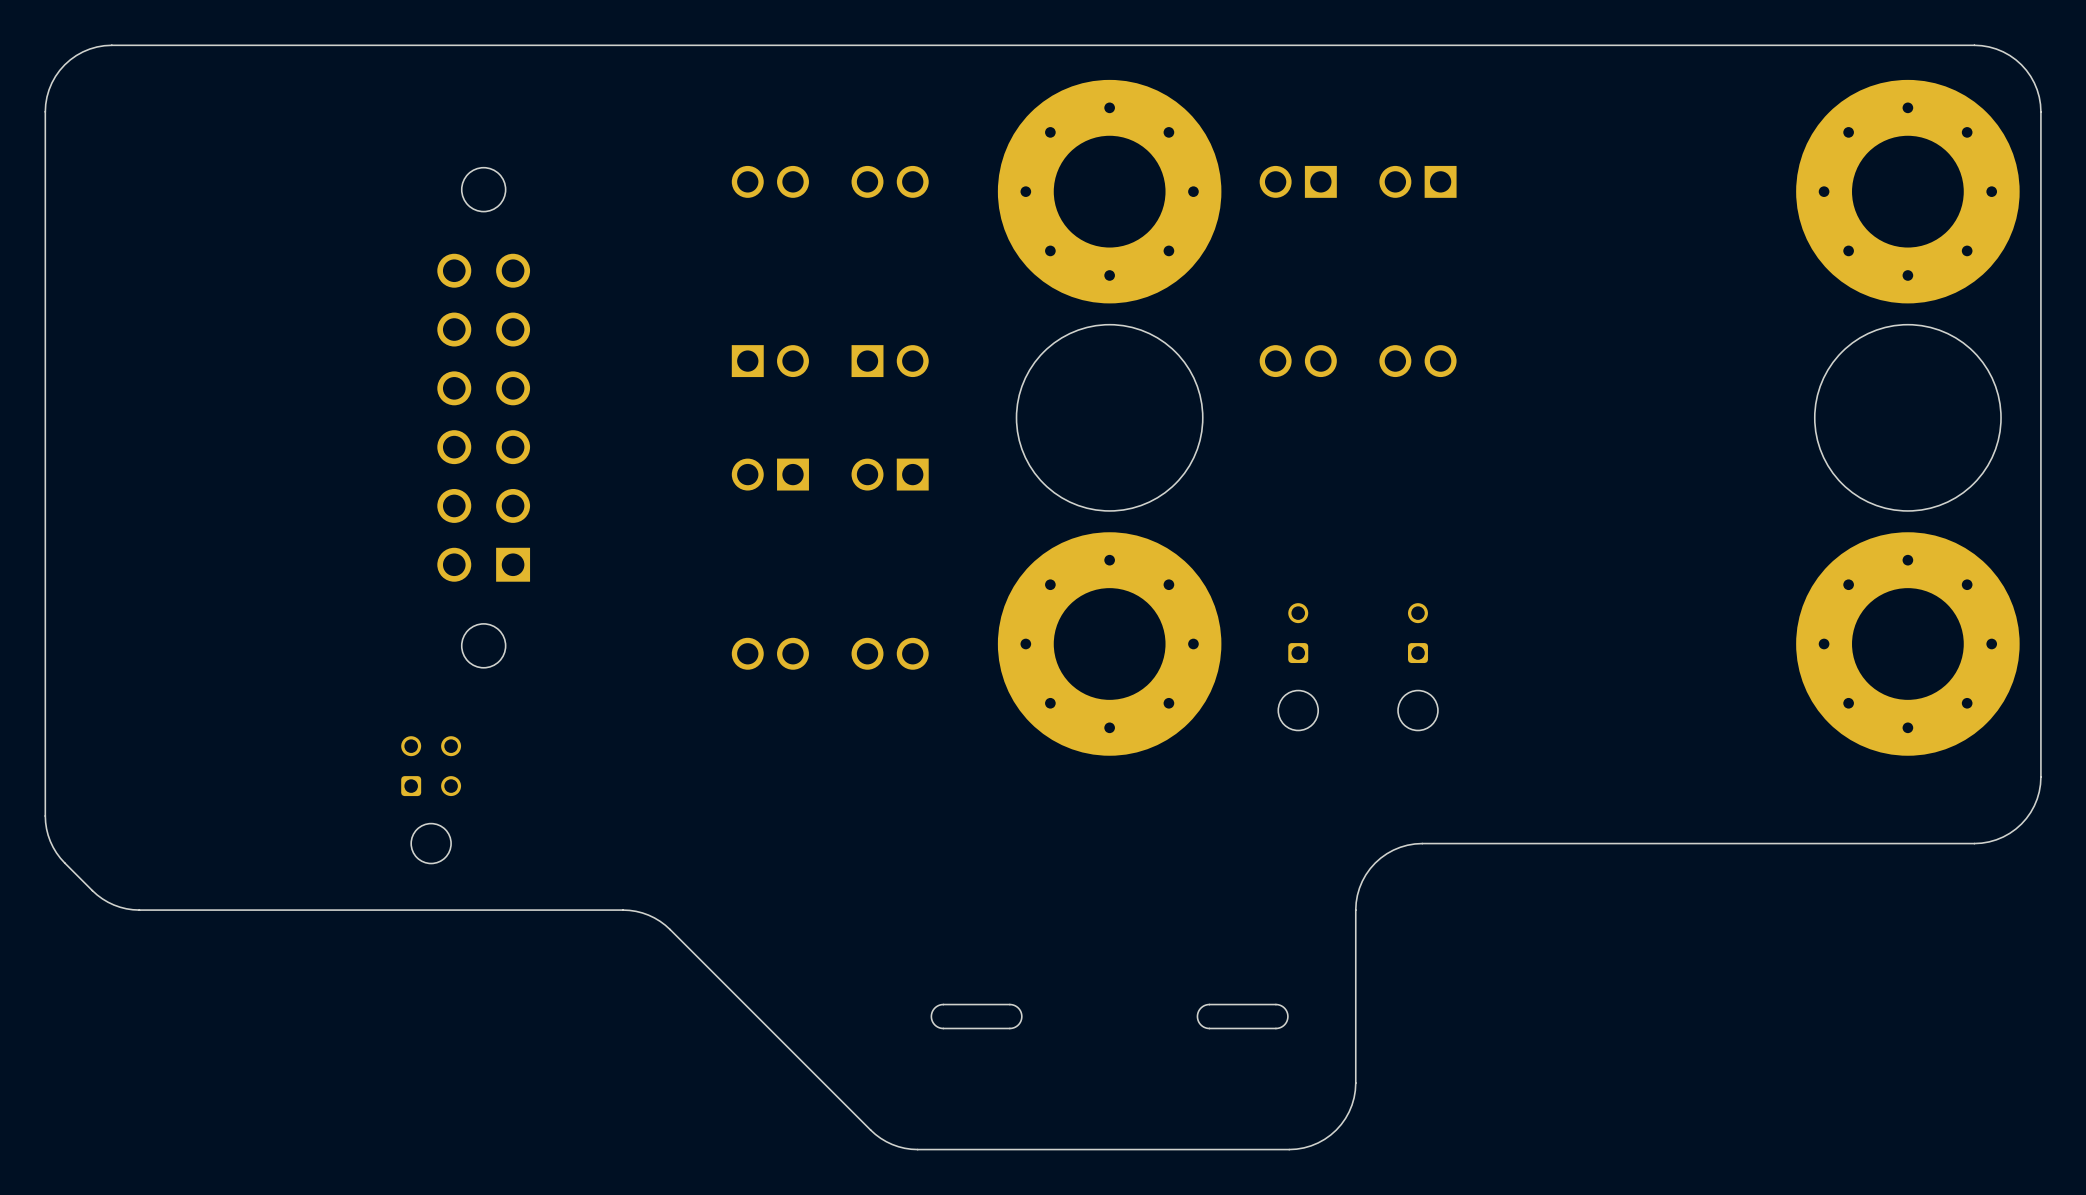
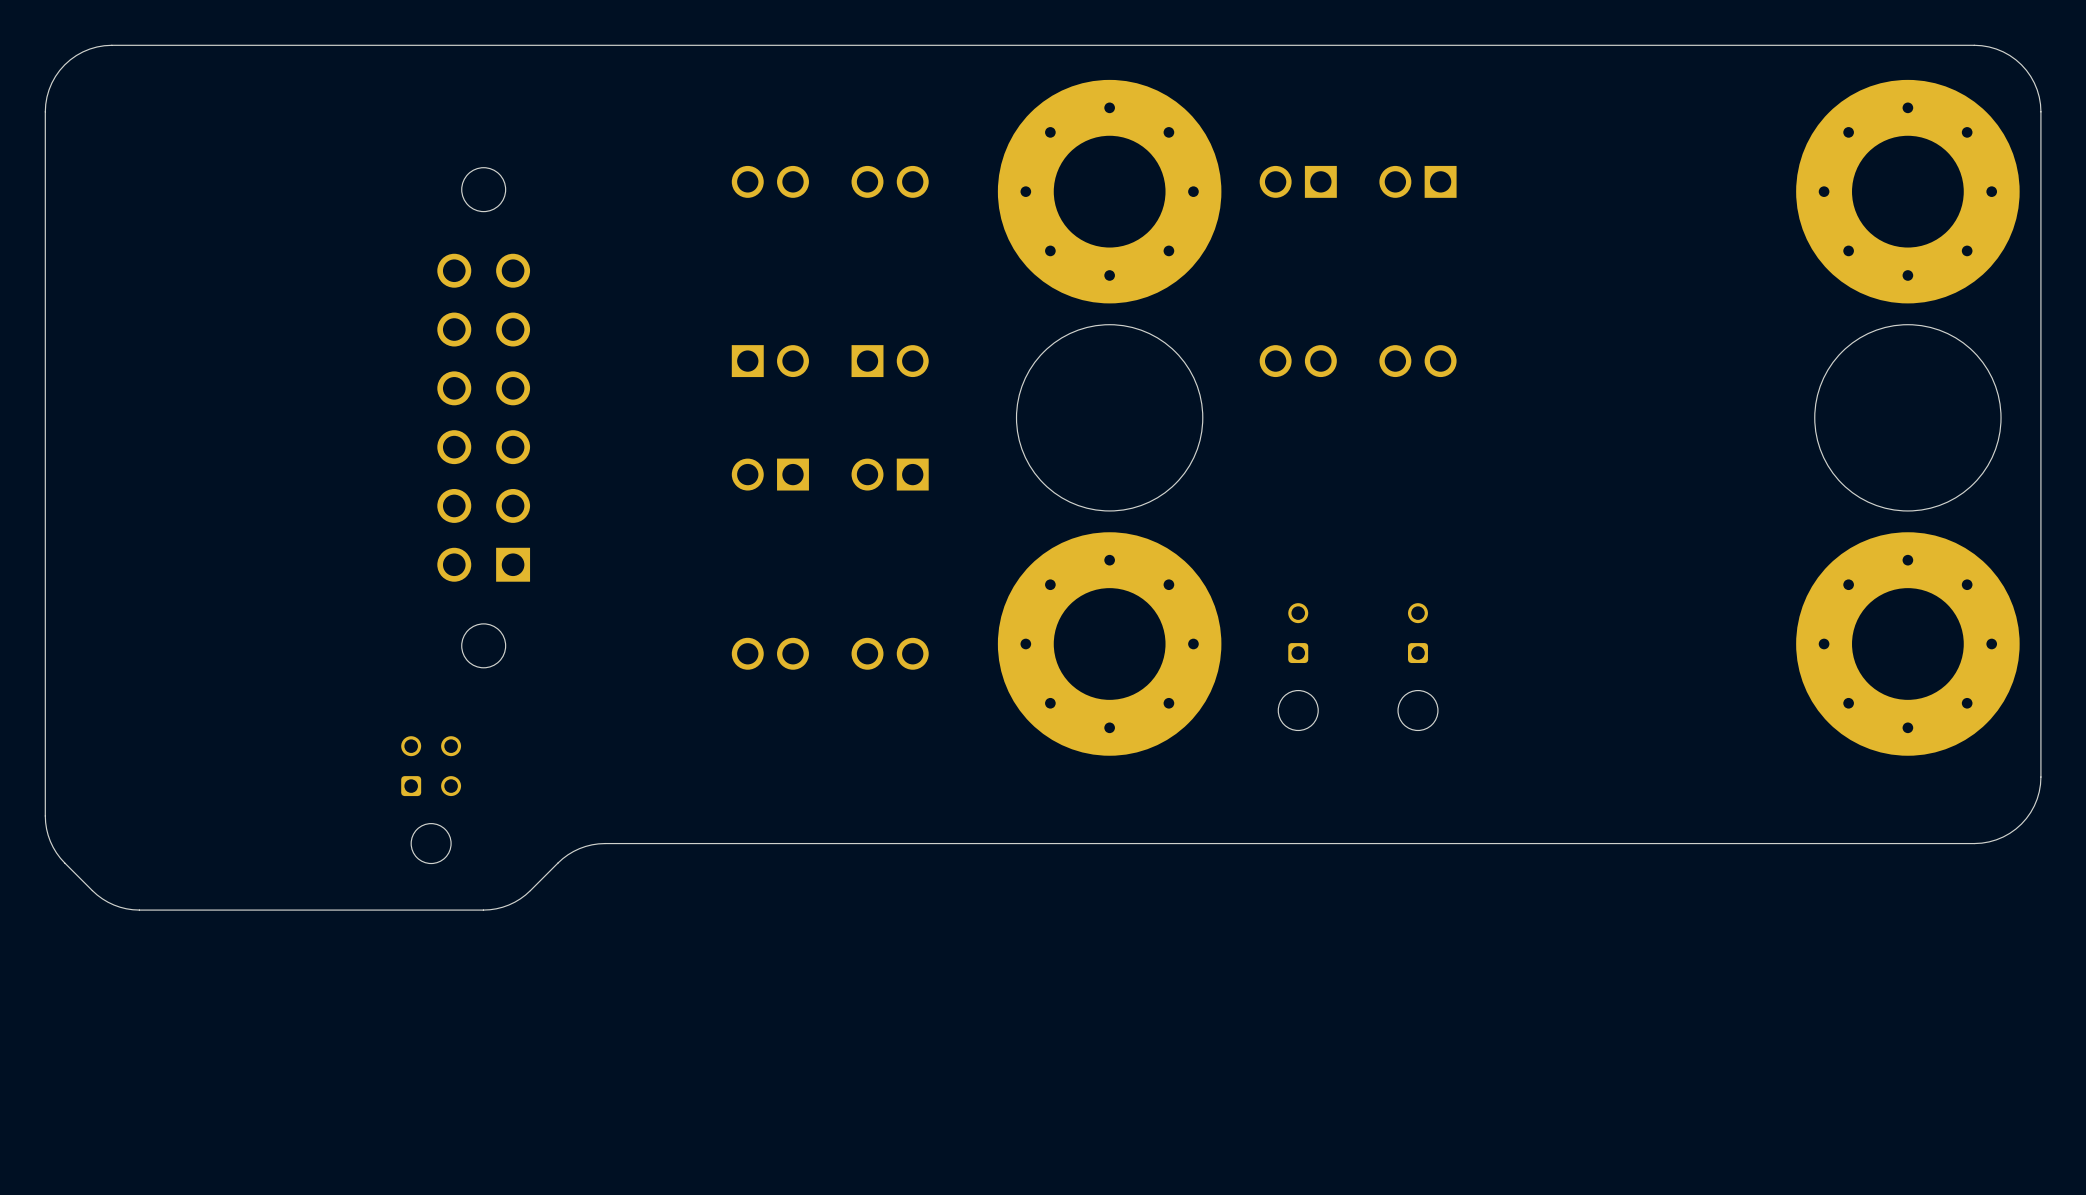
board edge: (1422, 843) (1407, 845) (1386, 853) (1370, 868) (1359, 888) (1355, 910) (1355, 1083) (1354, 1097) (1345, 1118) (1330, 1135) (1318, 1142) (1296, 1149) (917, 1149) (898, 1146) (886, 1141) (870, 1130) (670, 929) (654, 917) (636, 911) (623, 910) (483, 910) -> (1422, 843) (598, 843) (585, 846) (568, 854) (525, 894) (514, 902) (502, 907) (483, 910)
board edge: (1009, 1004) (941, 1004) (933, 1009) (931, 1018) (934, 1024) (941, 1028) (1011, 1028) (1018, 1024) (1021, 1016) (1017, 1007) (1009, 1004) -> none
board edge: (1275, 1004) (1207, 1004) (1199, 1009) (1197, 1017) (1201, 1025) (1207, 1028) (1277, 1028) (1285, 1023) (1287, 1015) (1283, 1007) (1275, 1004) -> none

